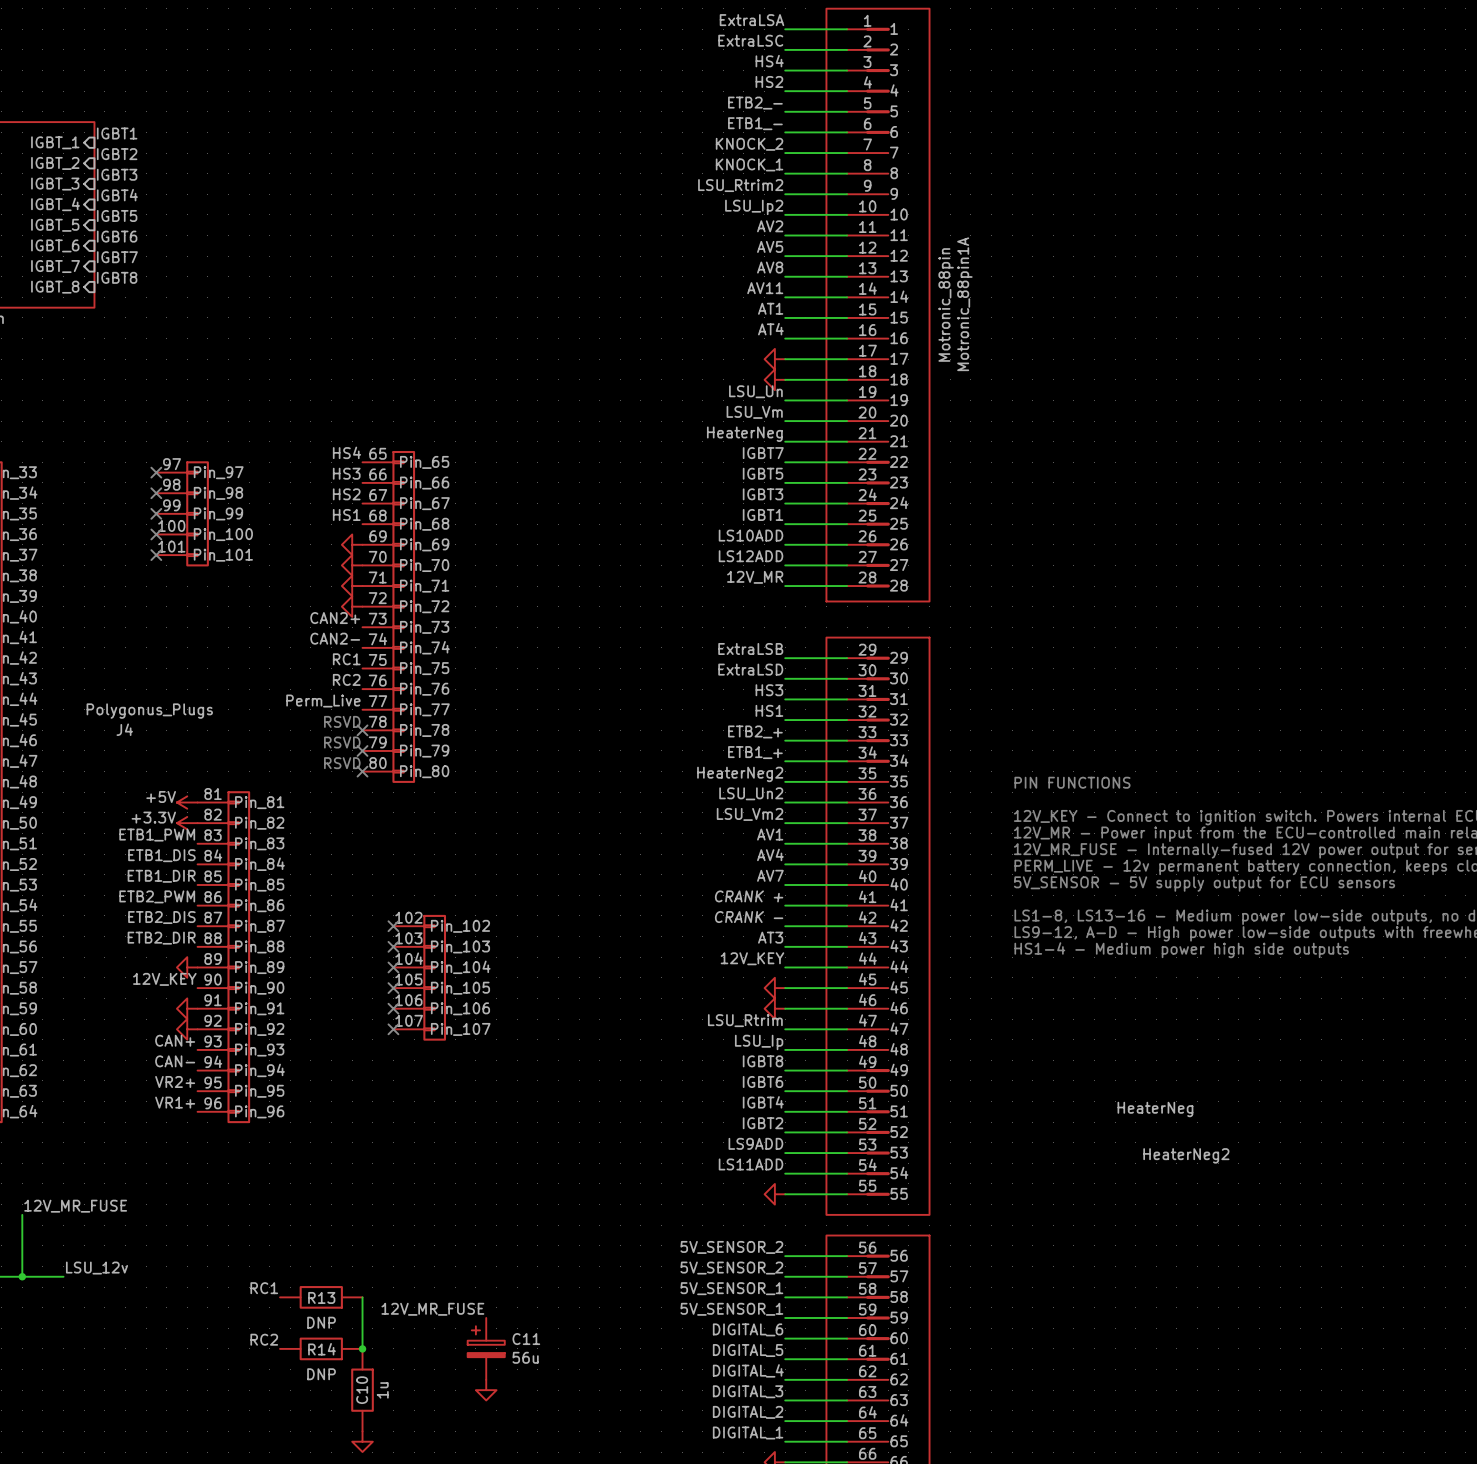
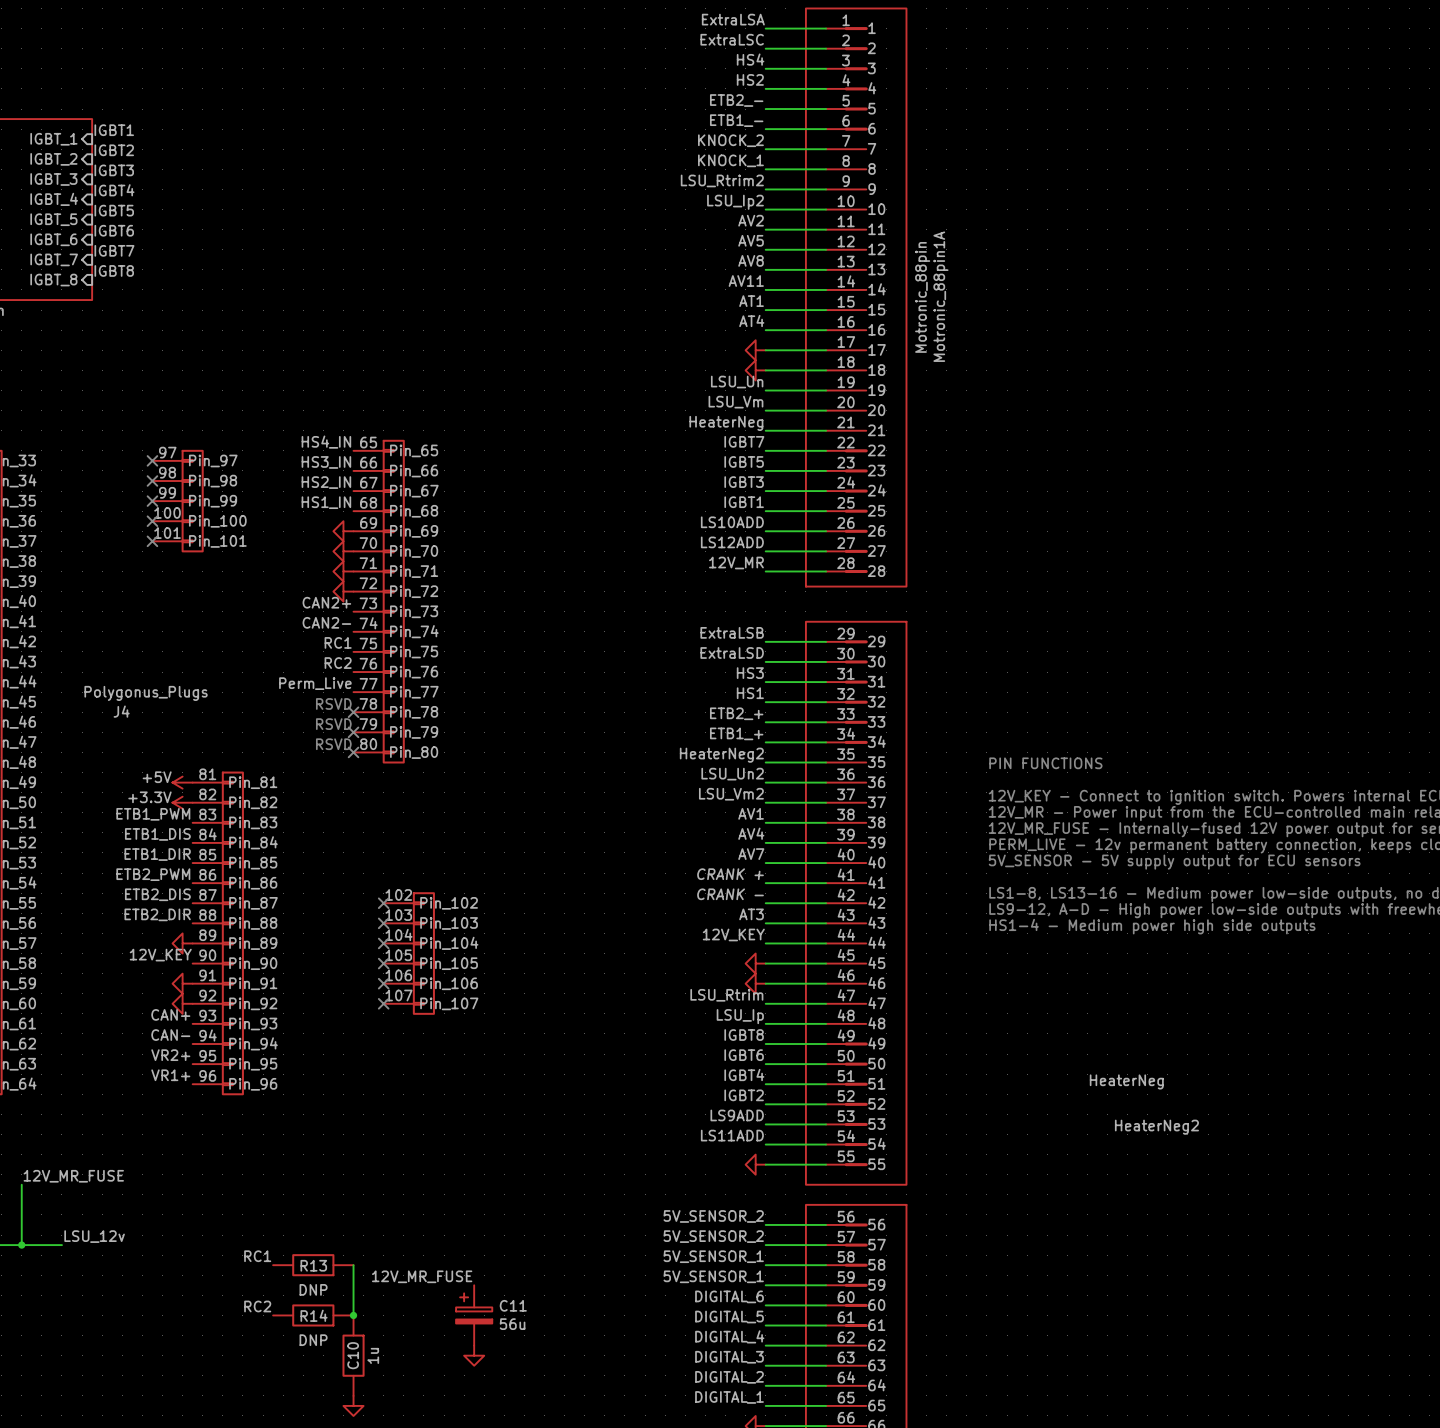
label: HS4 (346, 452) -> HS4_IN (326, 442)
label: HS3 (346, 473) -> HS3_IN (326, 462)
label: HS2 (346, 494) -> HS2_IN (326, 482)
label: HS1 (346, 514) -> HS1_IN (326, 502)

